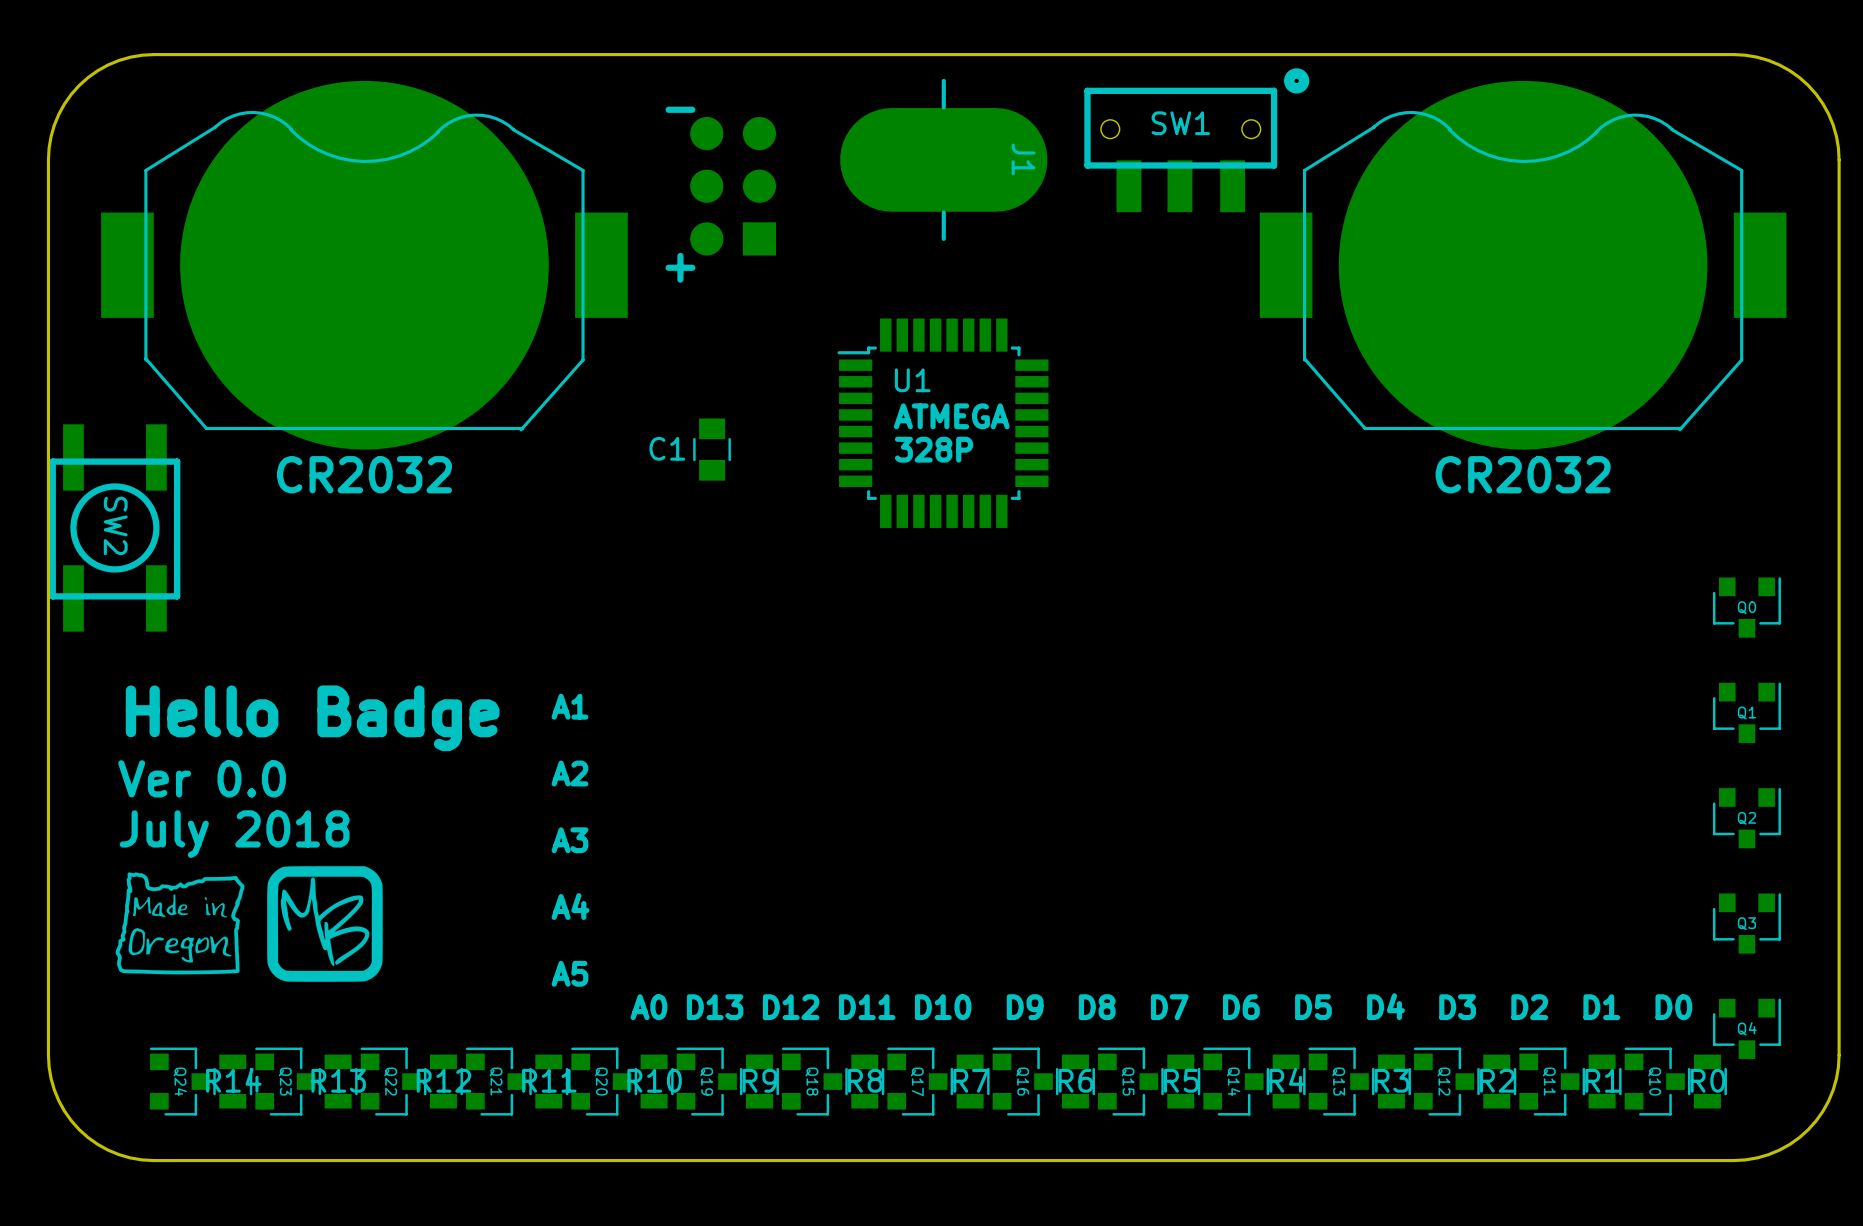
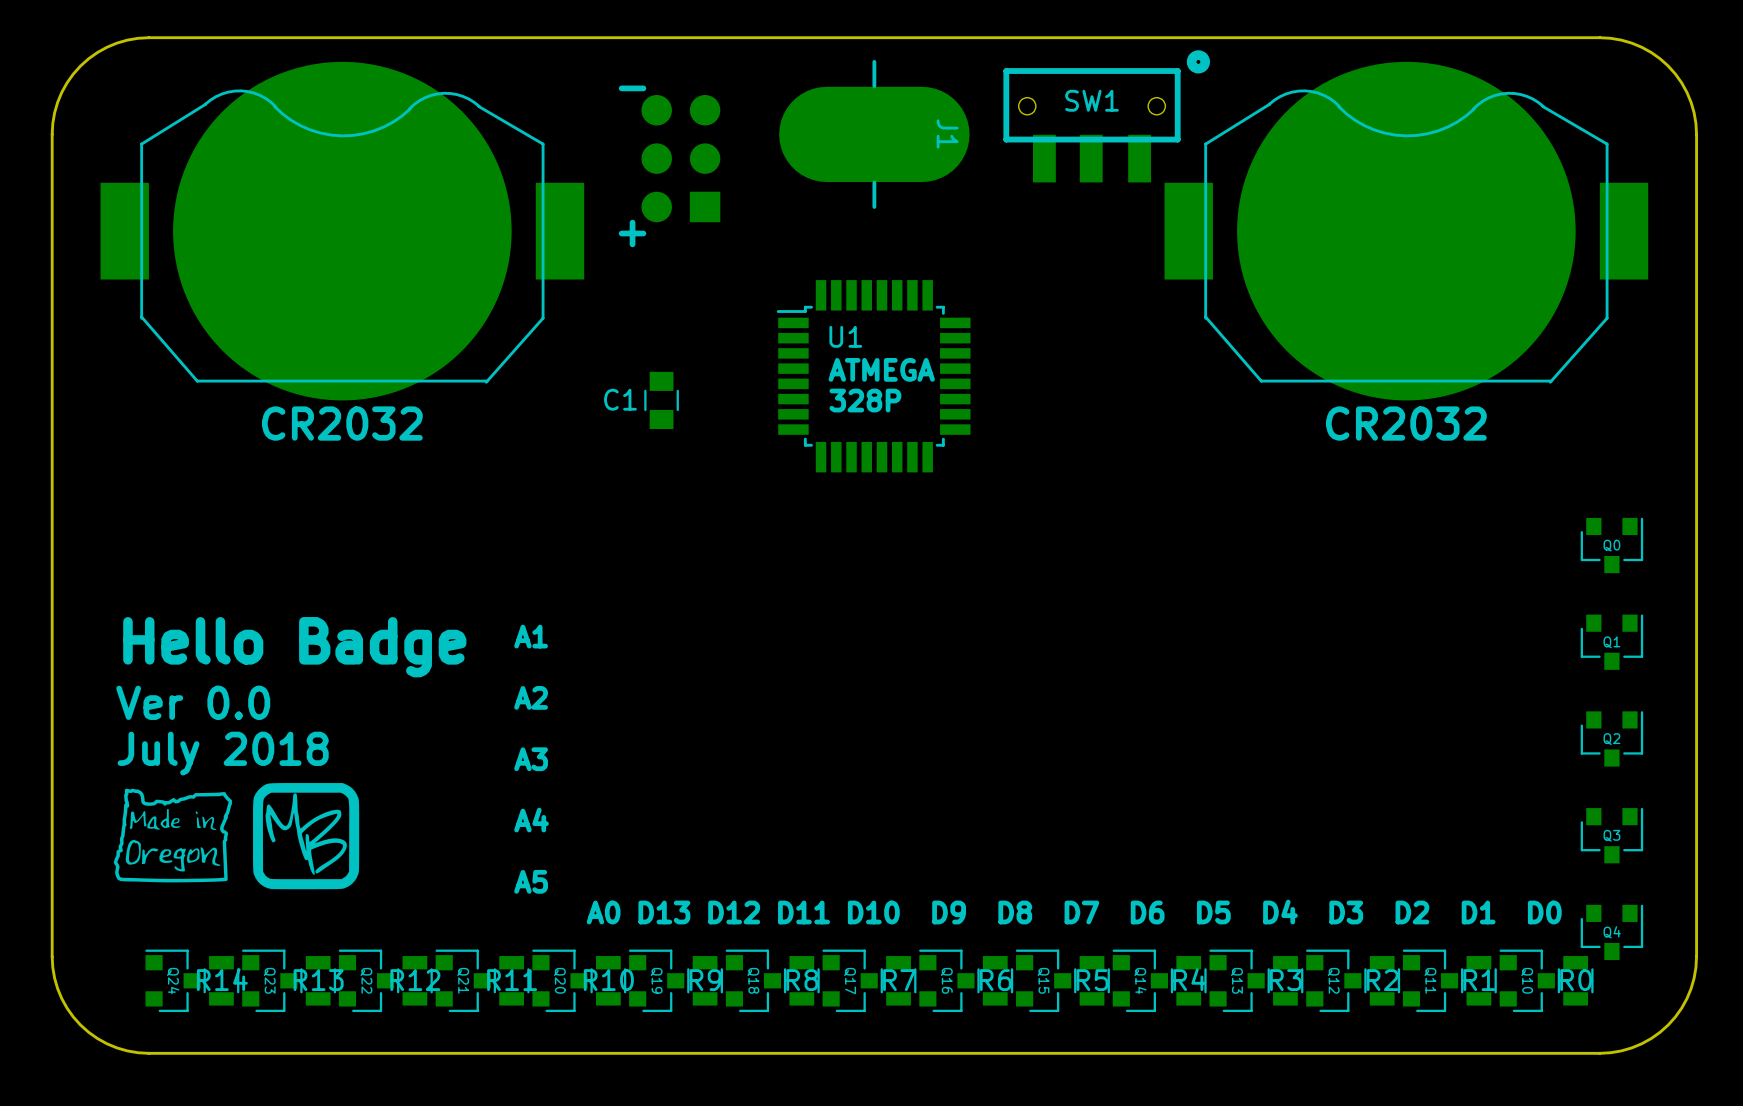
SW2: (114, 527) -> none

